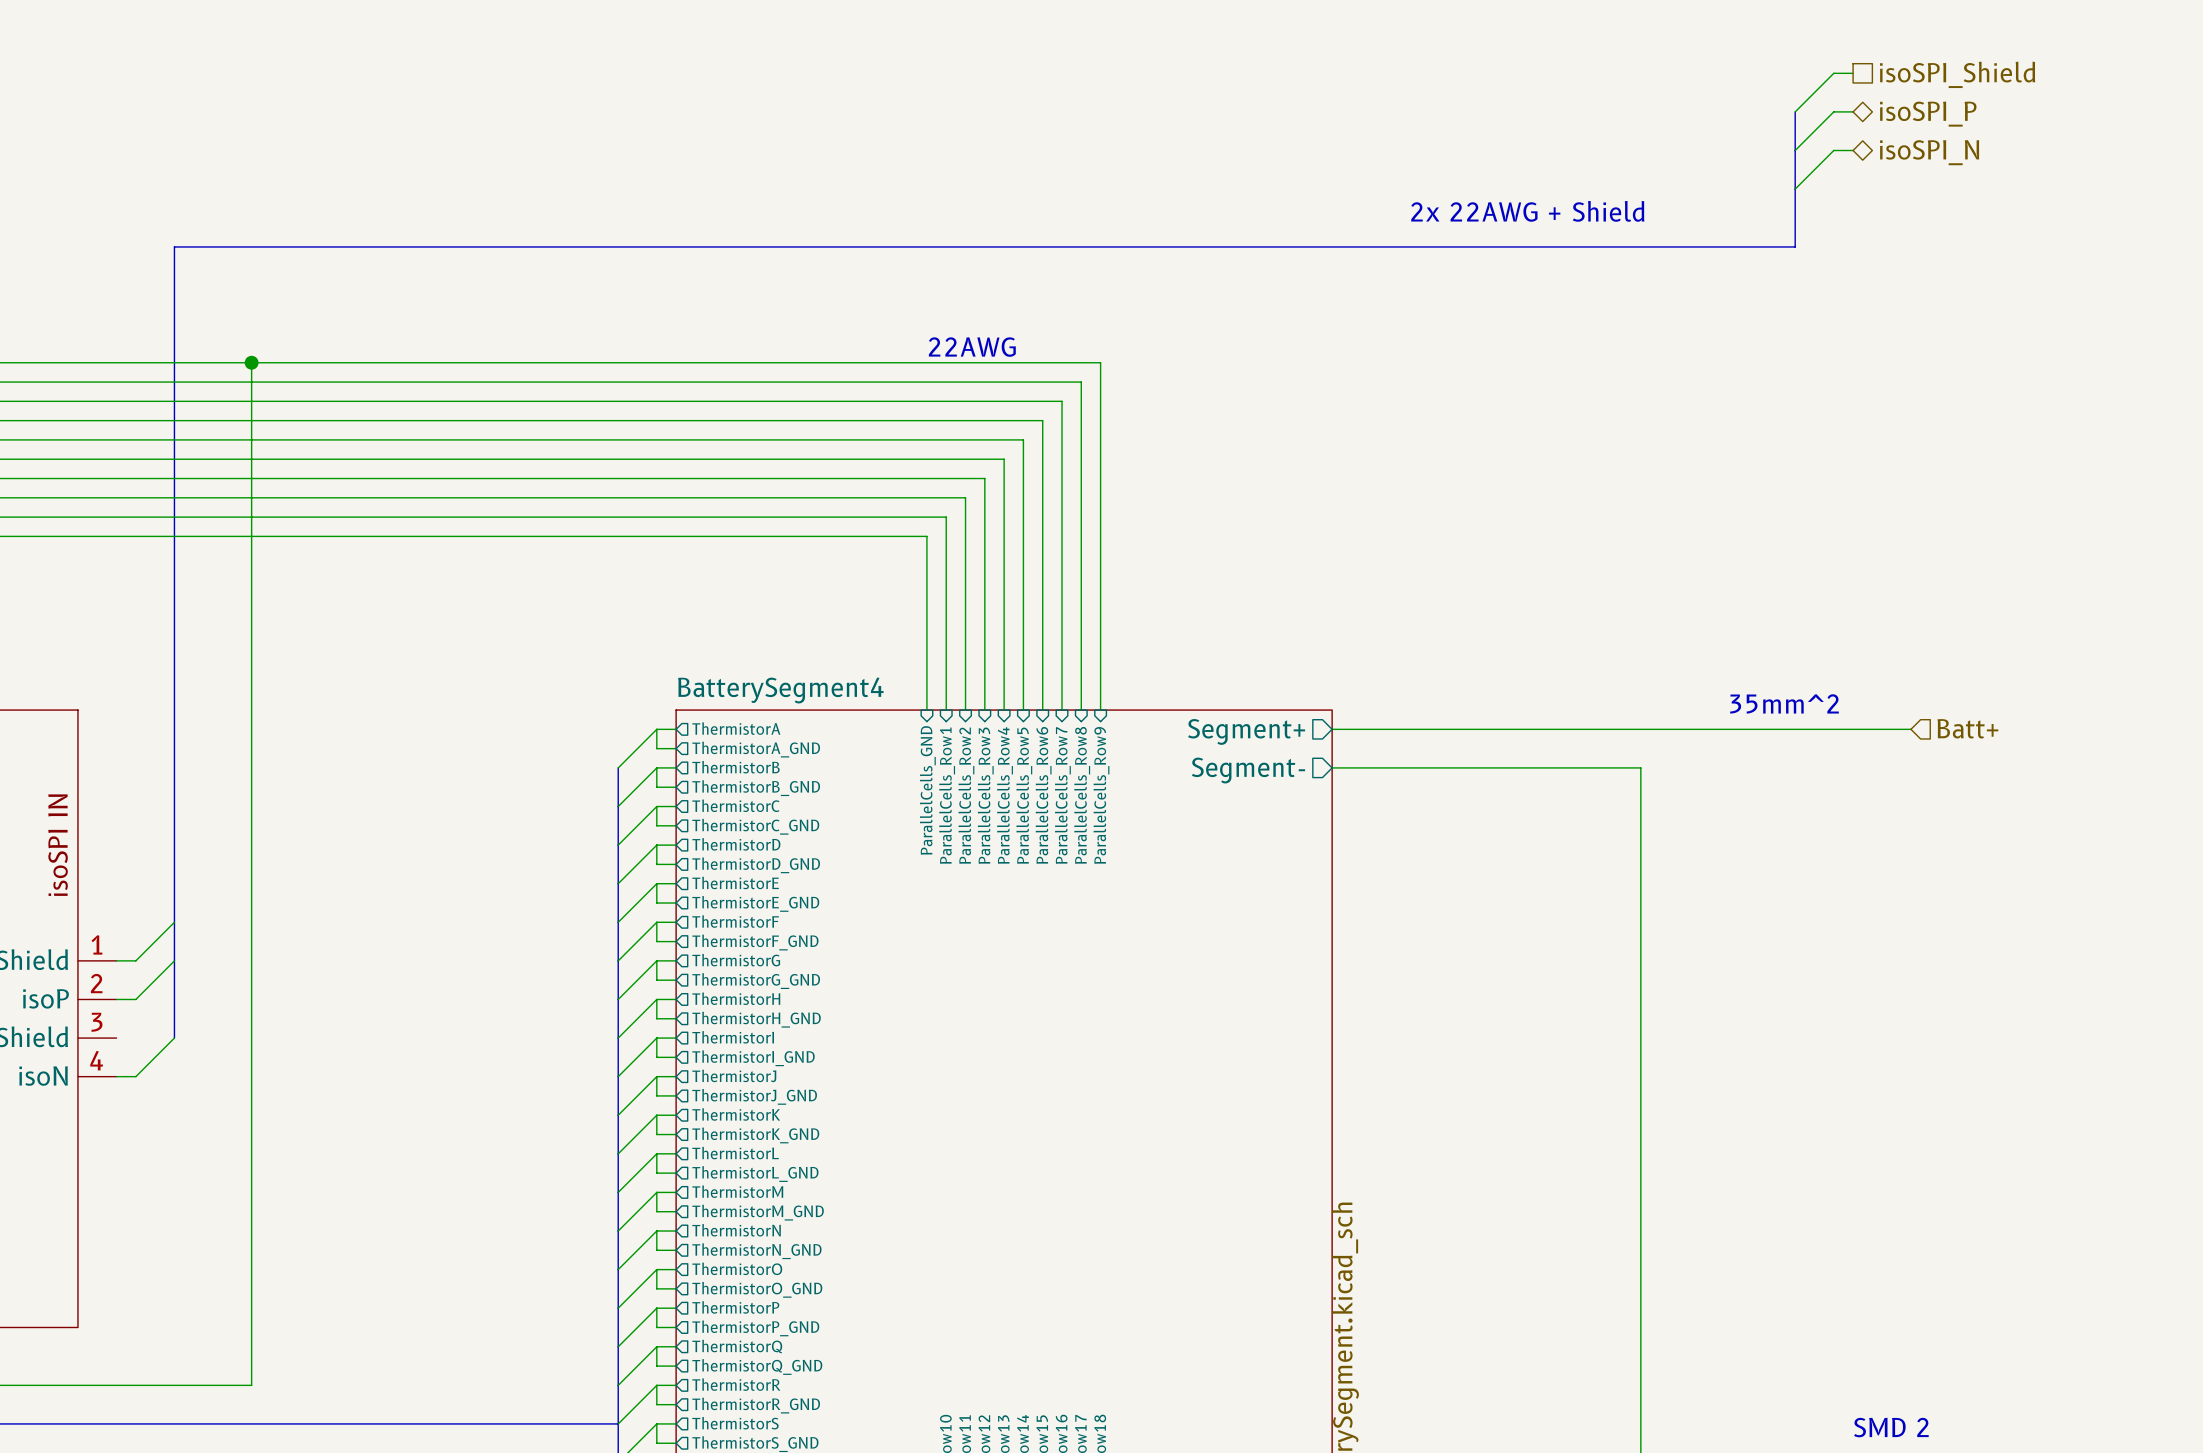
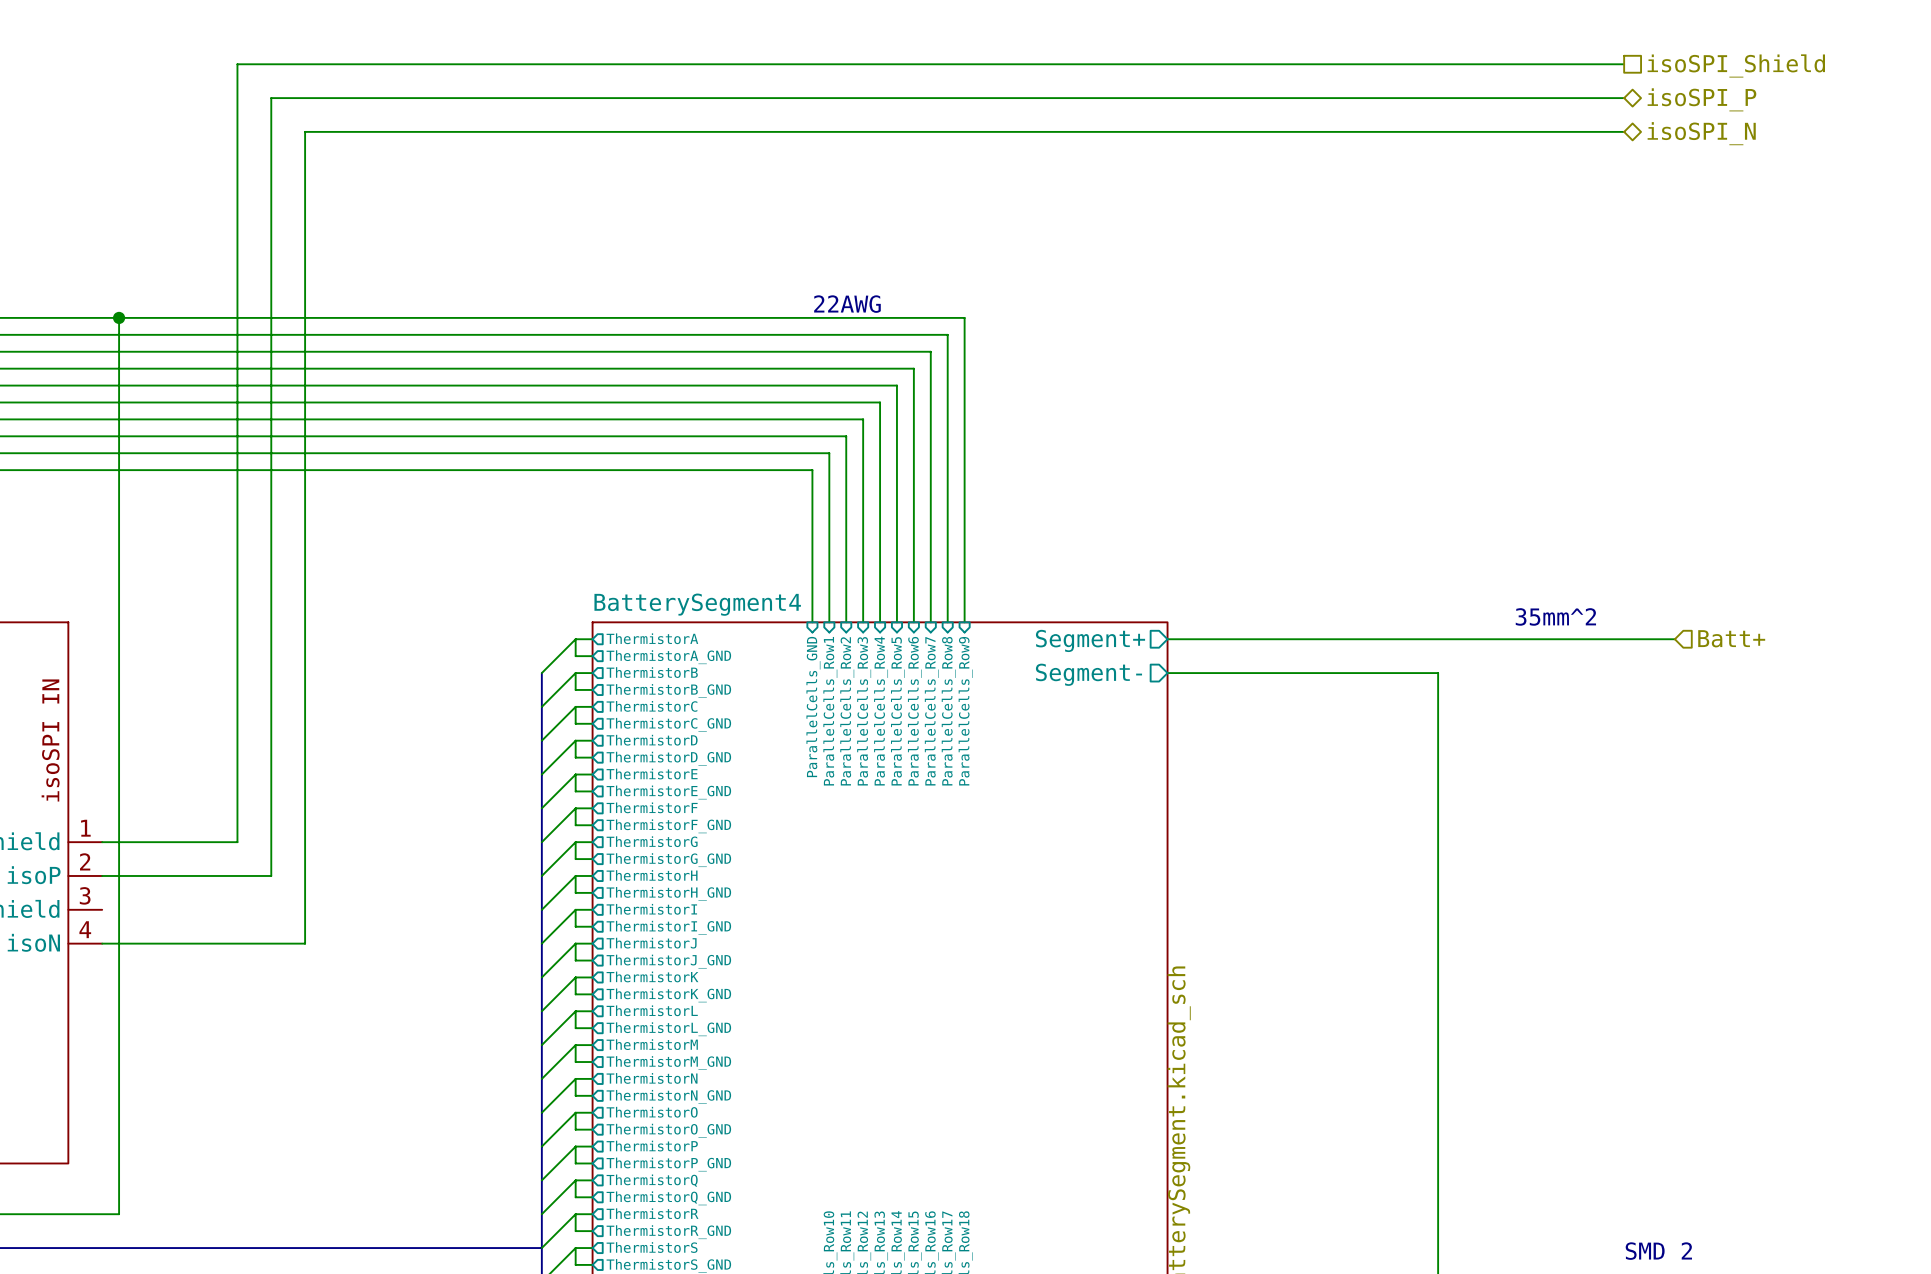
wire: (1833, 73) (1795, 111) -> (1607, 64) (237, 64) (237, 842) (119, 842)
bus: (1795, 111) (1795, 246) (174, 246) (174, 1038) -> none
wire: (1833, 111) (1795, 150) -> (1607, 98) (271, 98) (271, 875) (119, 875)
wire: (1833, 150) (1795, 189) -> (1607, 131) (305, 131) (305, 943) (119, 943)
text: 2x 22AWG + Shield (1527, 211) -> none
junction: none -> (119, 317)
wire: (251, 362) (251, 1385) (135, 1385) -> (119, 317) (119, 1214)
junction: (251, 362) -> none
wire: (174, 922) (135, 960) -> none
wire: (174, 960) (135, 999) -> none
wire: (174, 1038) (135, 1076) -> none

